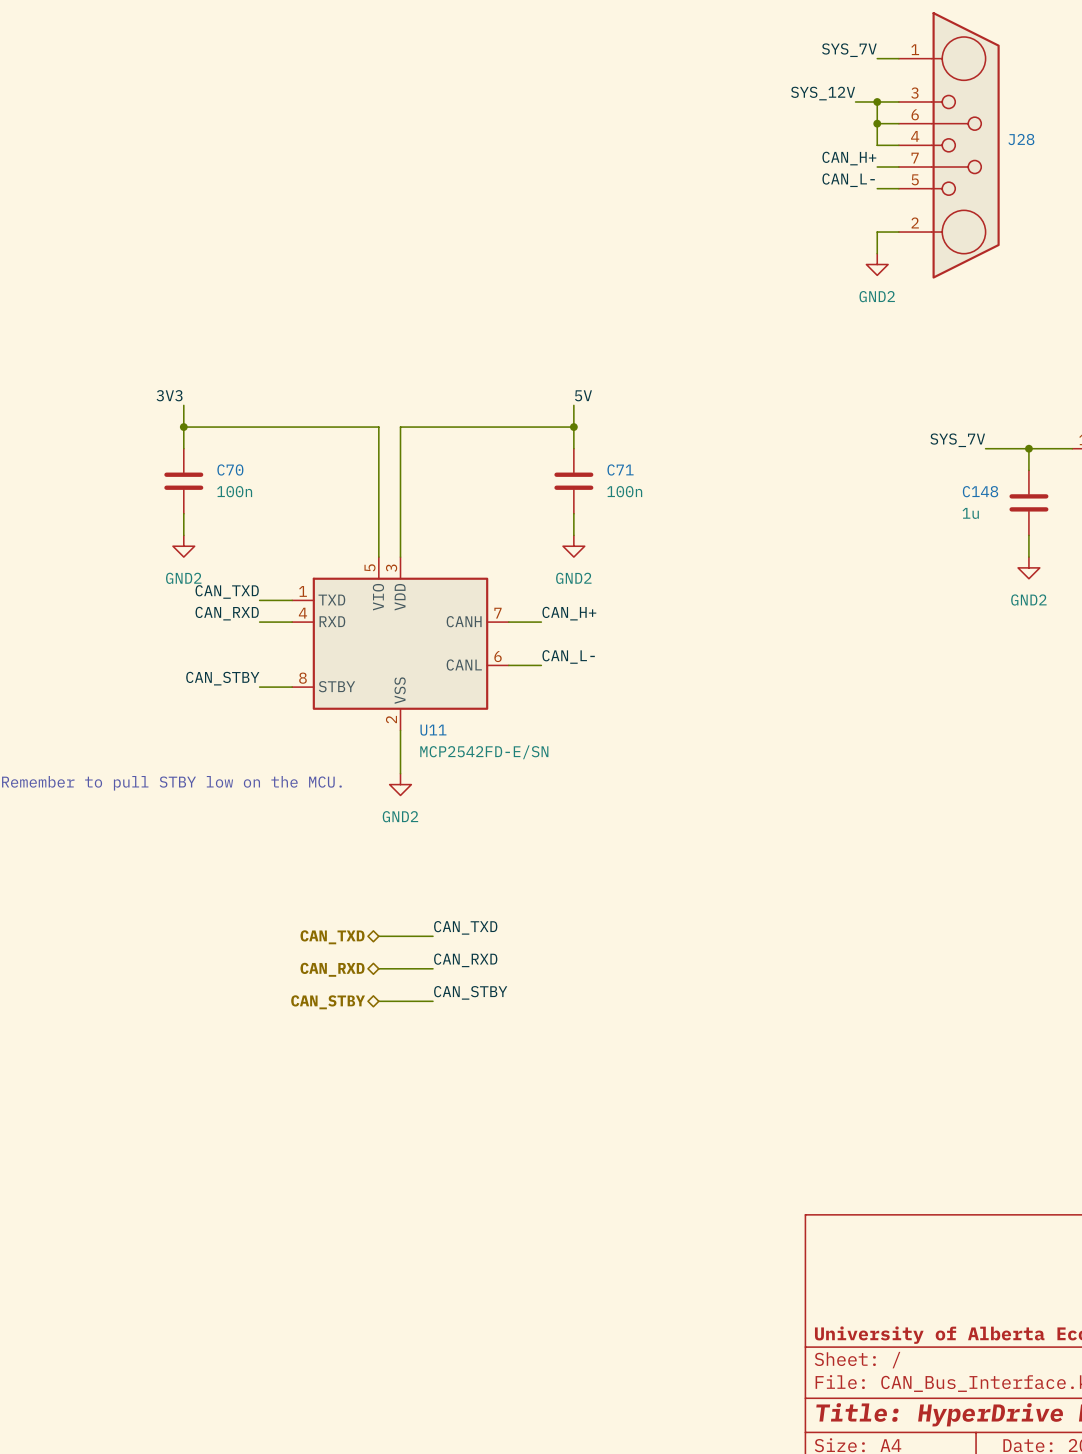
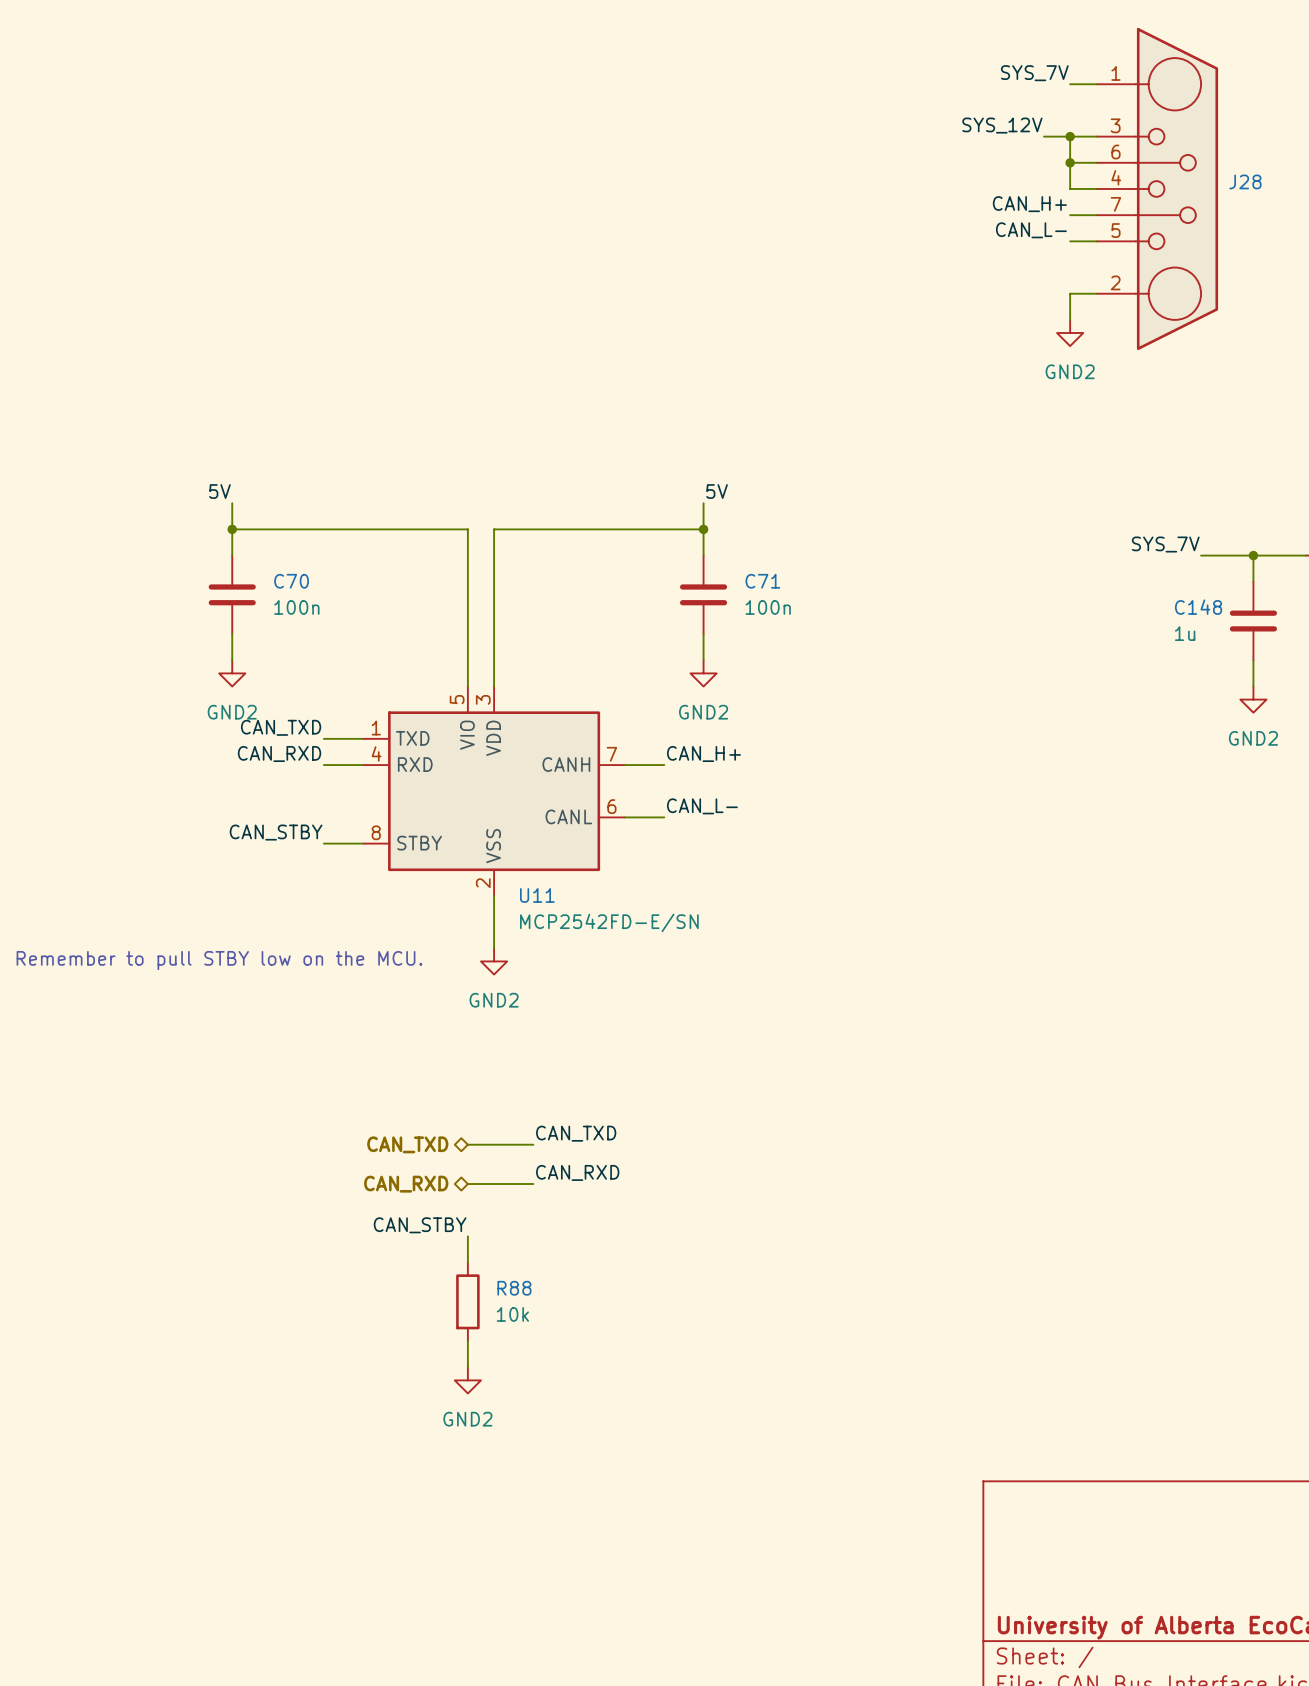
label: 3V3 (169, 395) -> 5V (219, 491)
label position: CAN_STBY (470, 992) -> CAN_STBY (420, 1225)
wire: (378, 1001) (433, 1001) -> none
hierarchical label: CAN_STBY (328, 1002) -> none
wire: none -> (467, 1236) (467, 1262)
R88: none -> 10k (467, 1301)
wire: none -> (467, 1341) (467, 1367)
power symbol: none -> GND2 (467, 1380)

